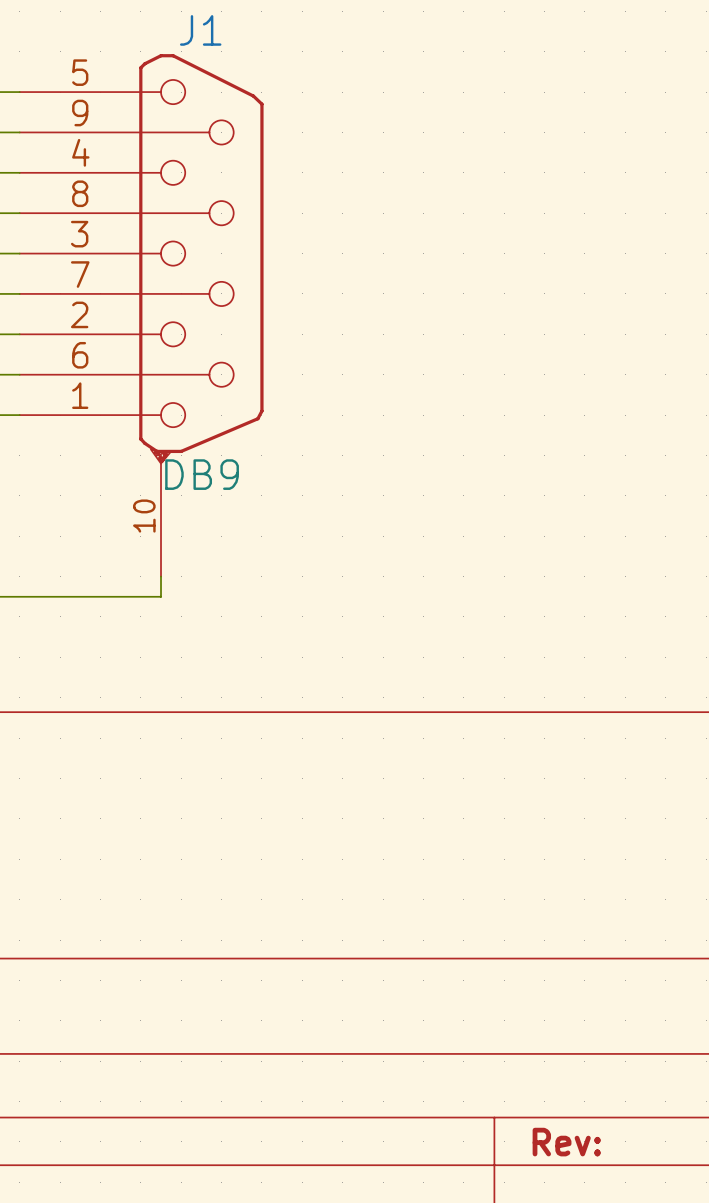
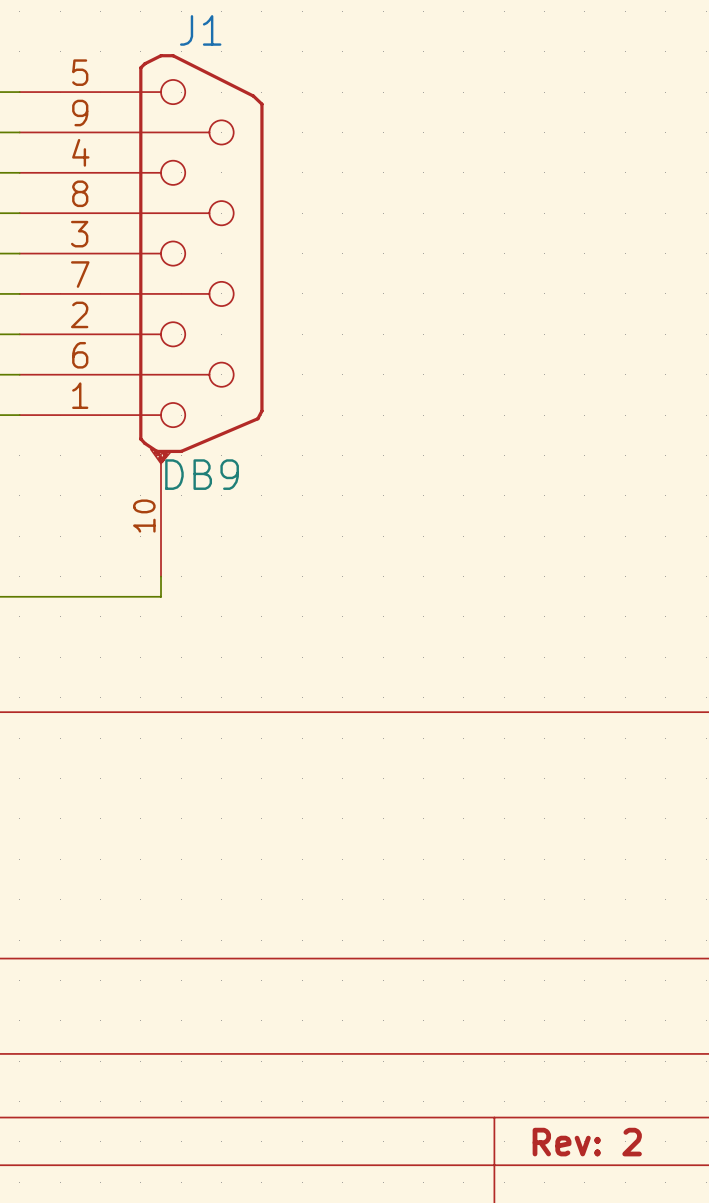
title block: Rev: (566, 1142) -> Rev: 2 (587, 1142)

